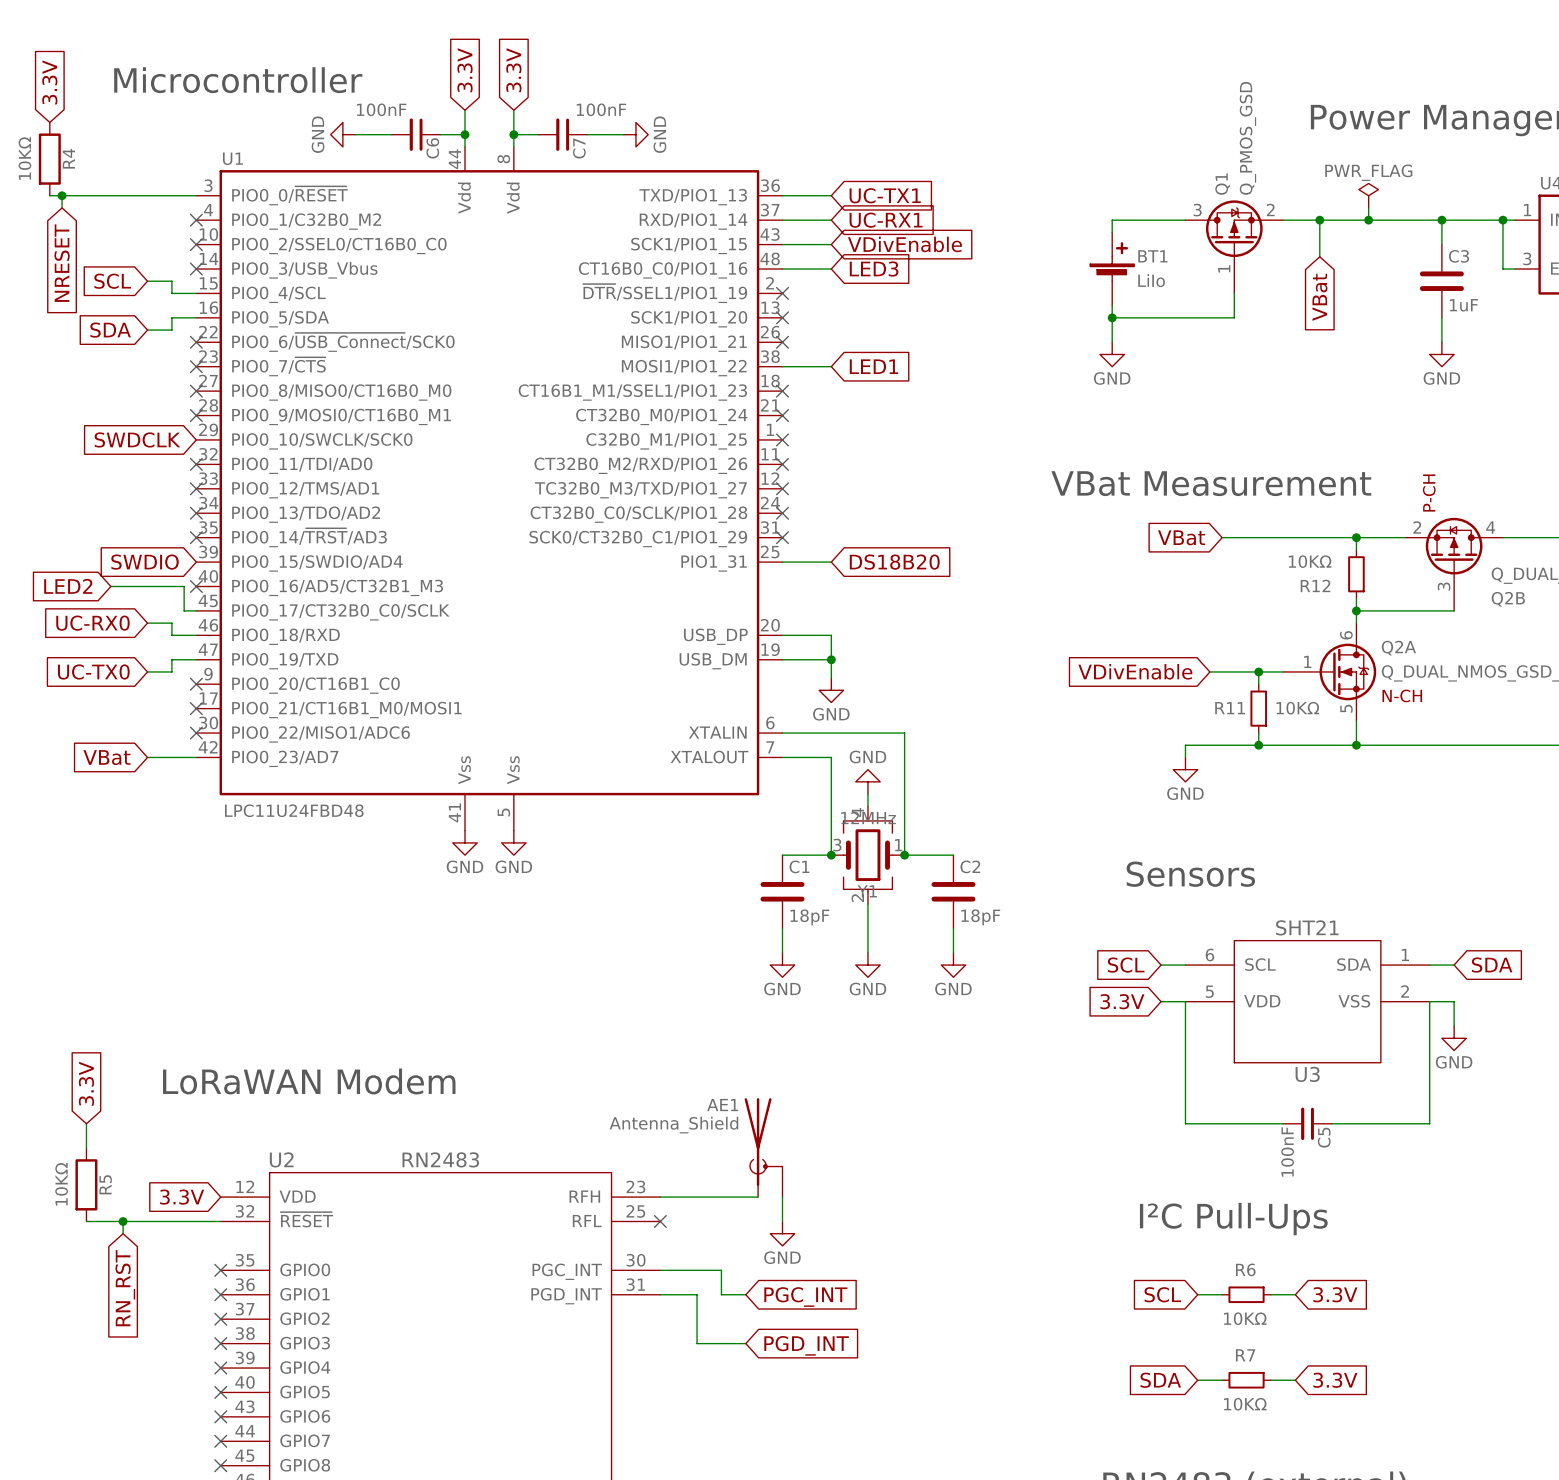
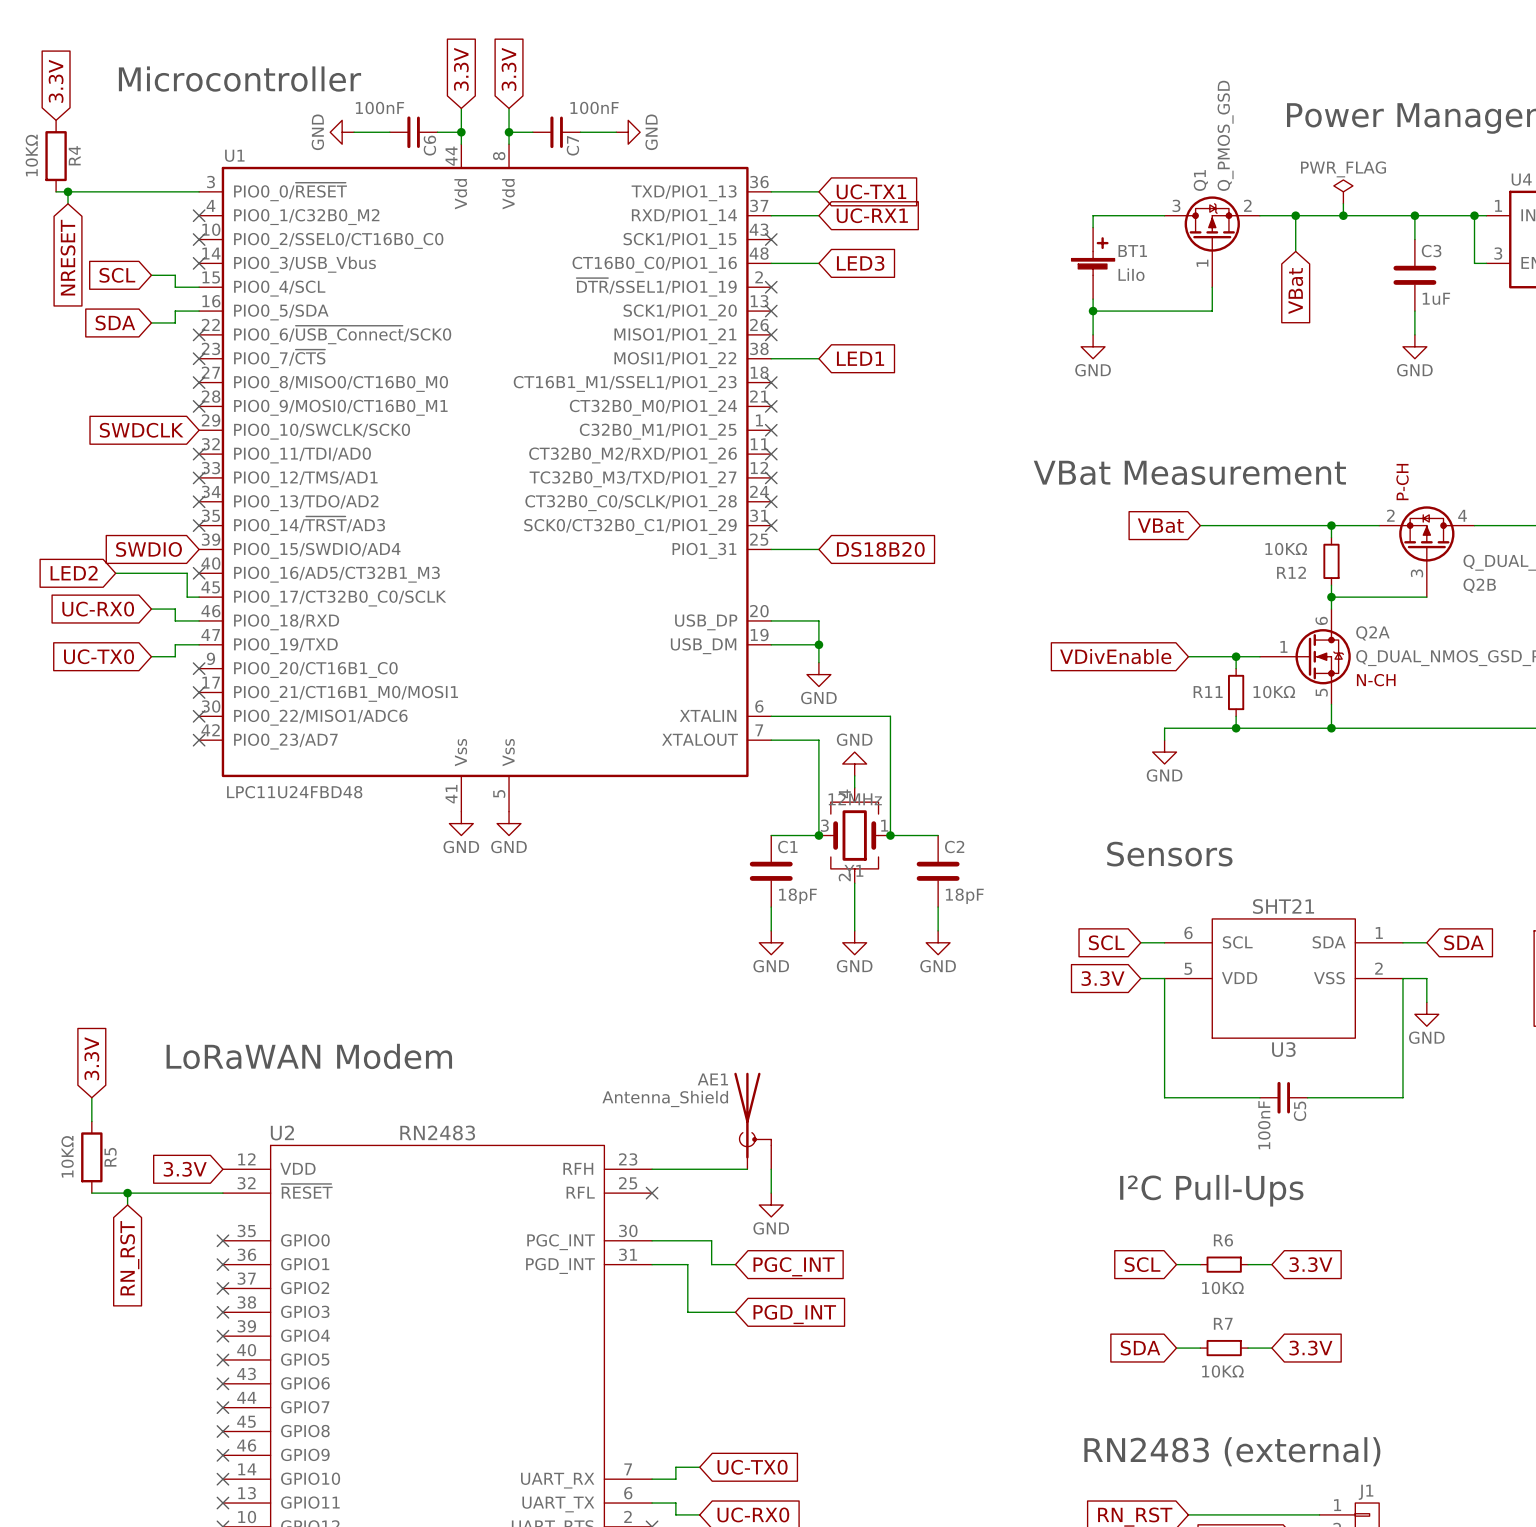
wire: (782, 244) (831, 244) -> none
no-connect mark: none -> (771, 239)
global label: VDivEnable (904, 244) -> none
global label: VBat (106, 757) -> none
wire: (147, 757) (196, 757) -> none
no-connect mark: none -> (199, 740)

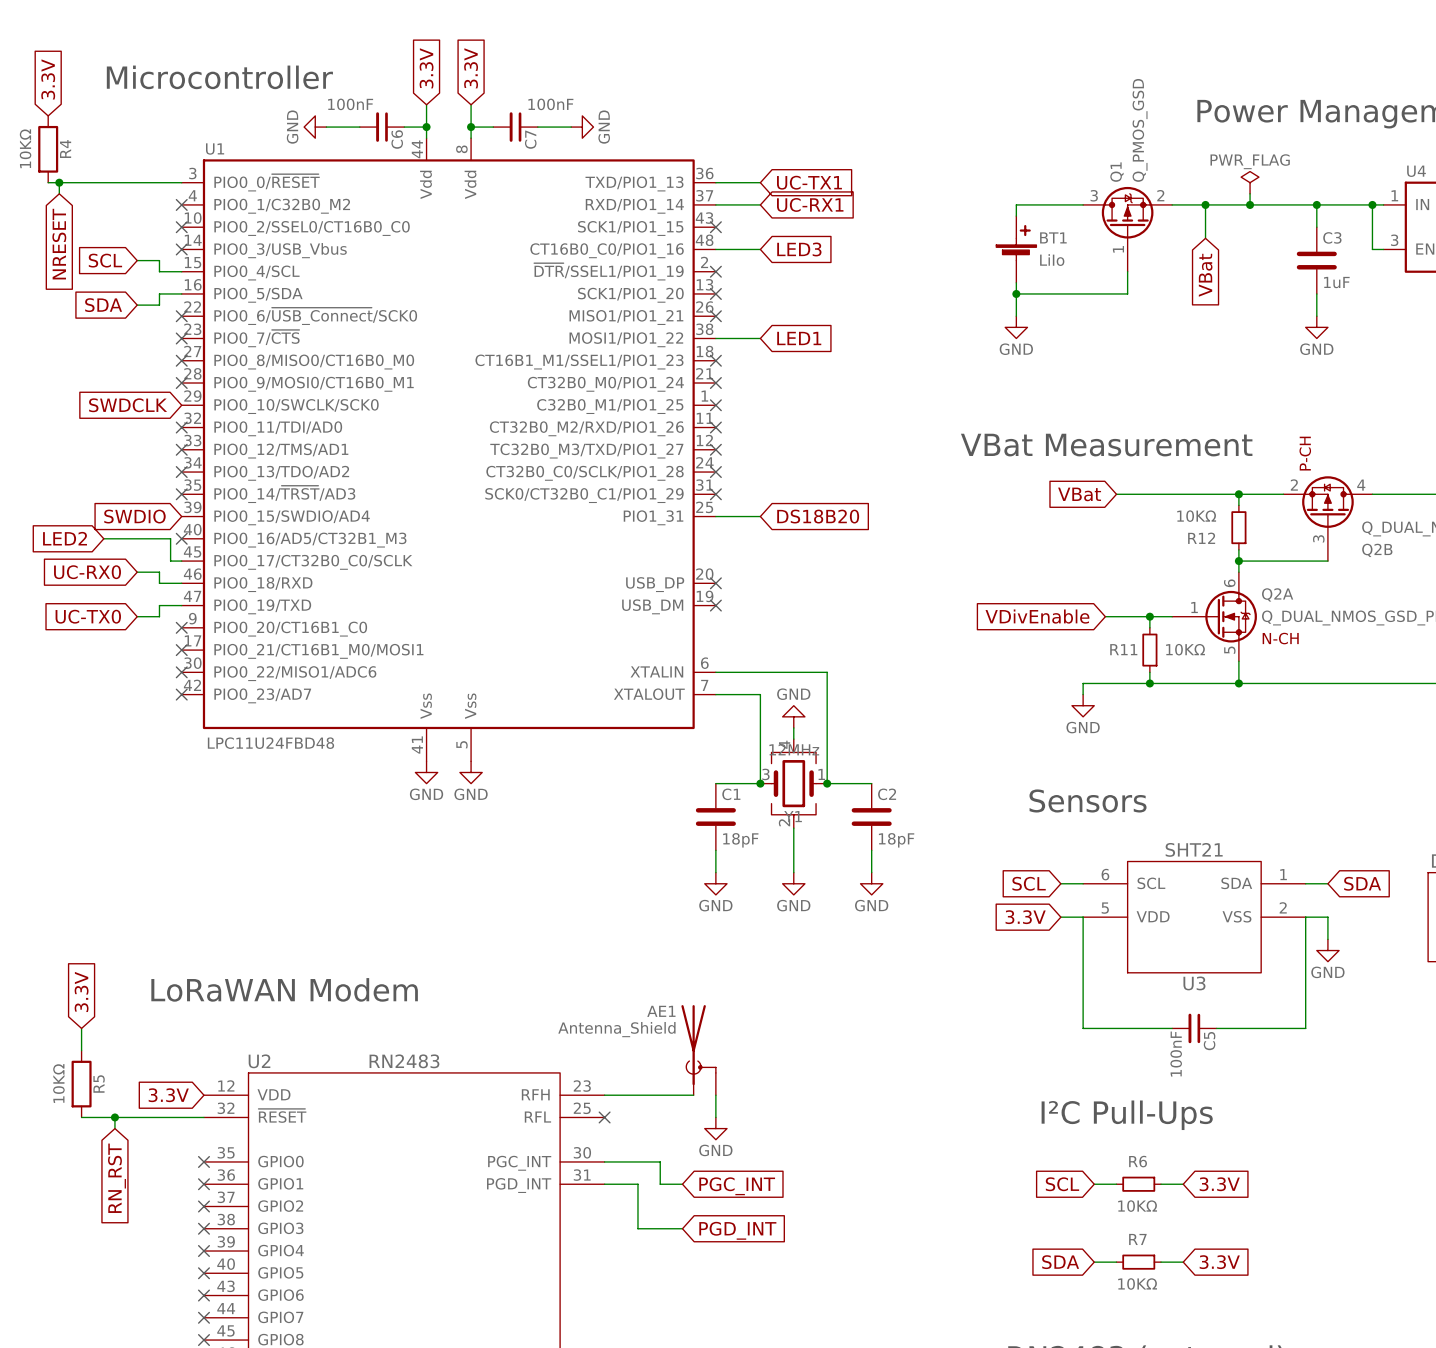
wire: (771, 620) (818, 620) (818, 662) -> none
no-connect mark: none -> (715, 583)
wire: (771, 644) (818, 644) -> none
no-connect mark: none -> (715, 605)
junction: (818, 644) -> none
power symbol: GND (818, 674) -> none

